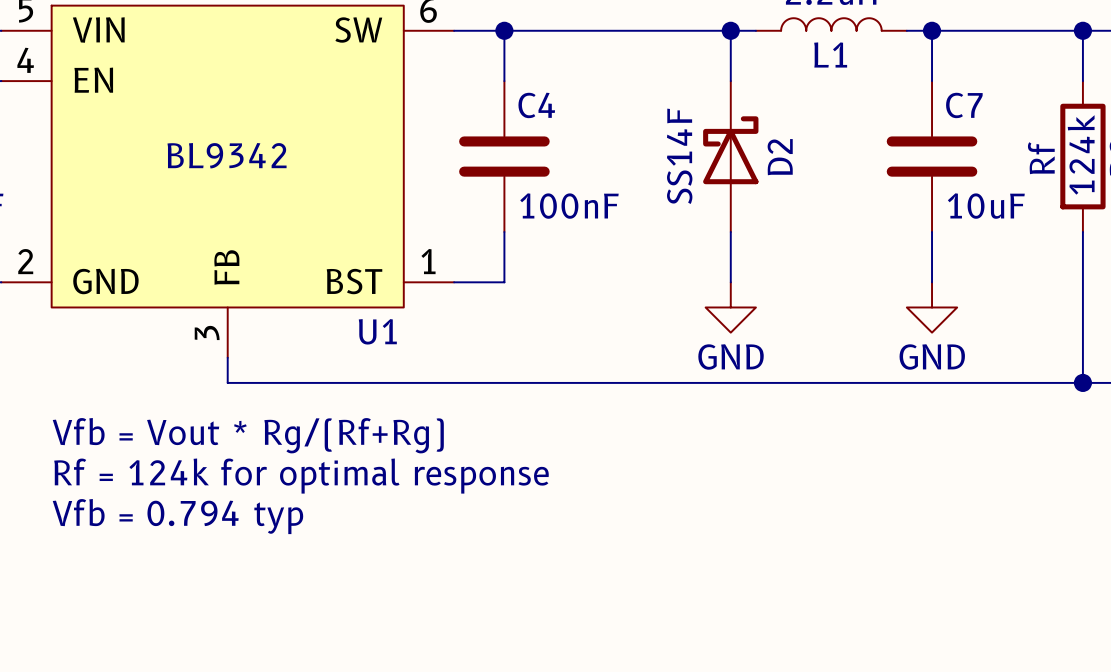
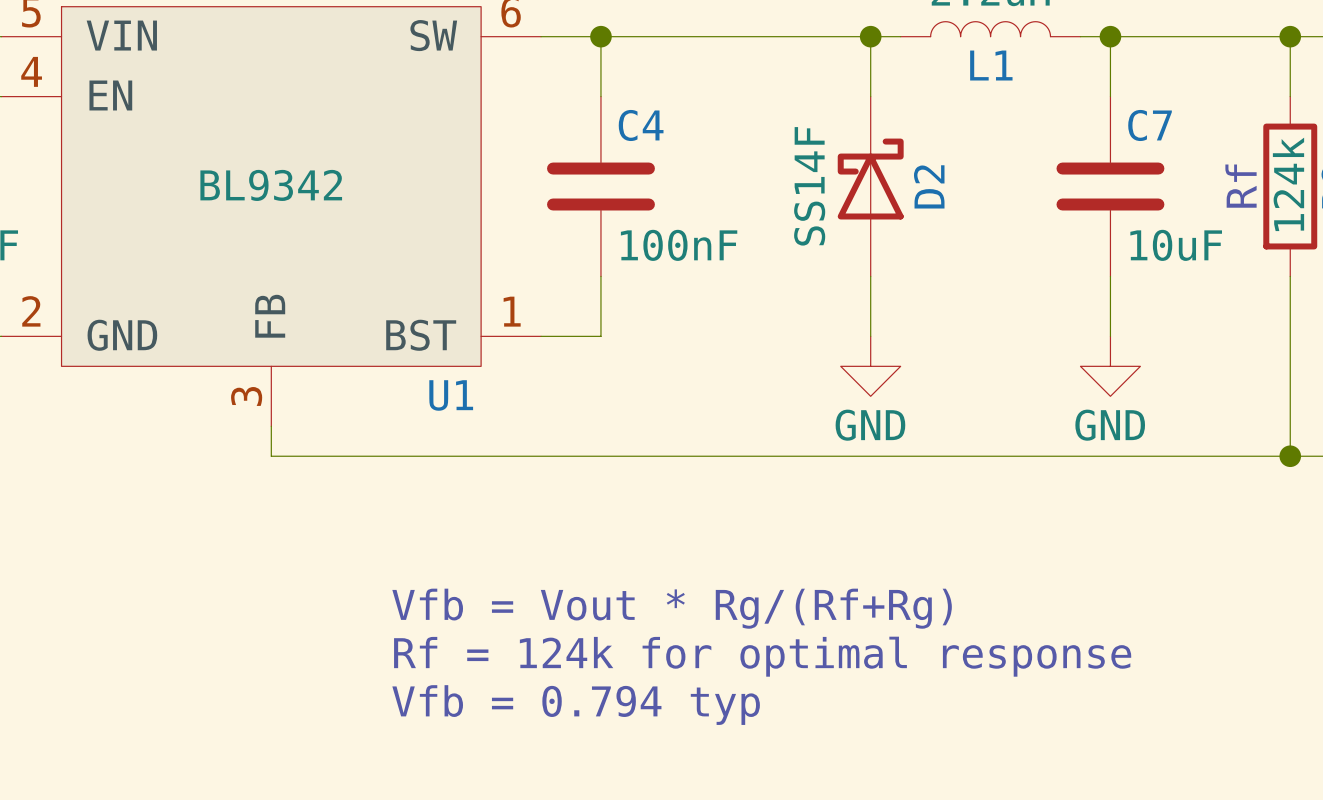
text position: Vfb = Vout * Rg/(Rf+Rg) (248, 435) -> Vfb = Vout * Rg/(Rf+Rg) (672, 608)
text position: Rf = 124k for optimal response (301, 476) -> Rf = 124k for optimal response (762, 656)
text position: Vfb = 0.794 typ (177, 516) -> Vfb = 0.794 typ (576, 705)

